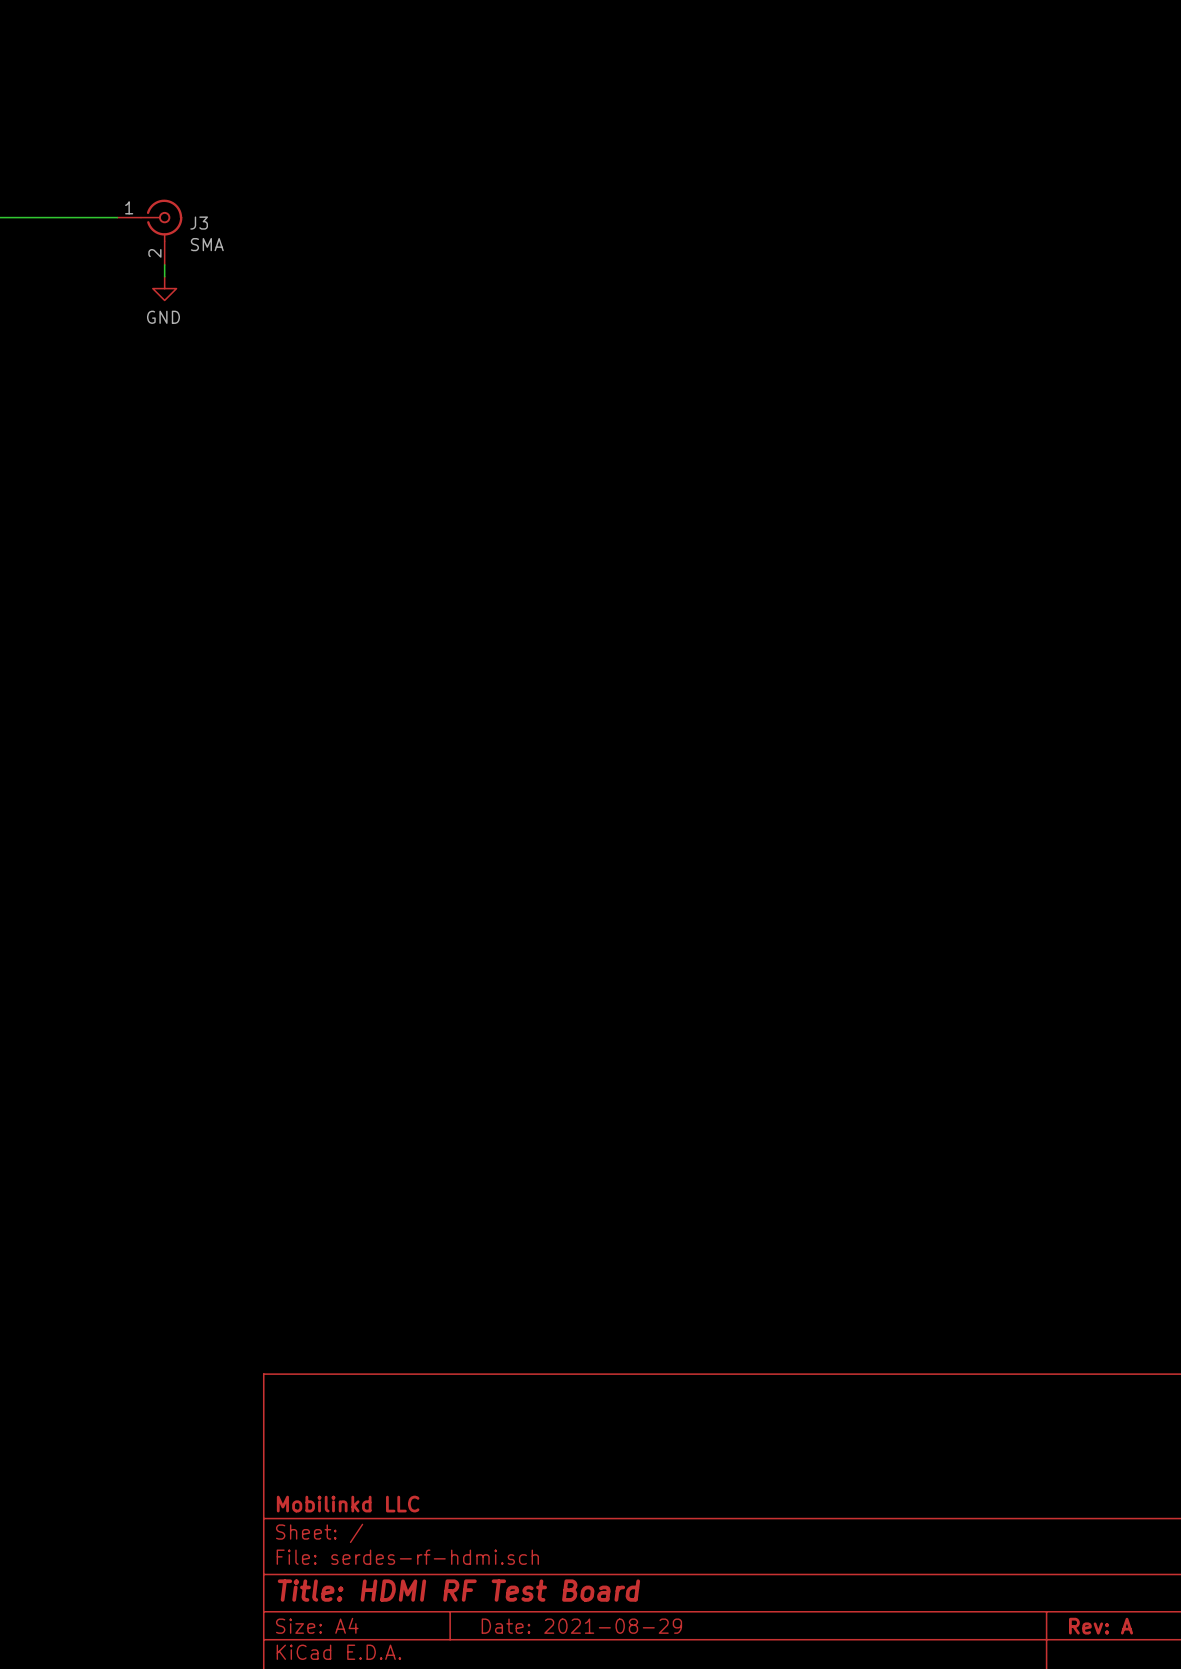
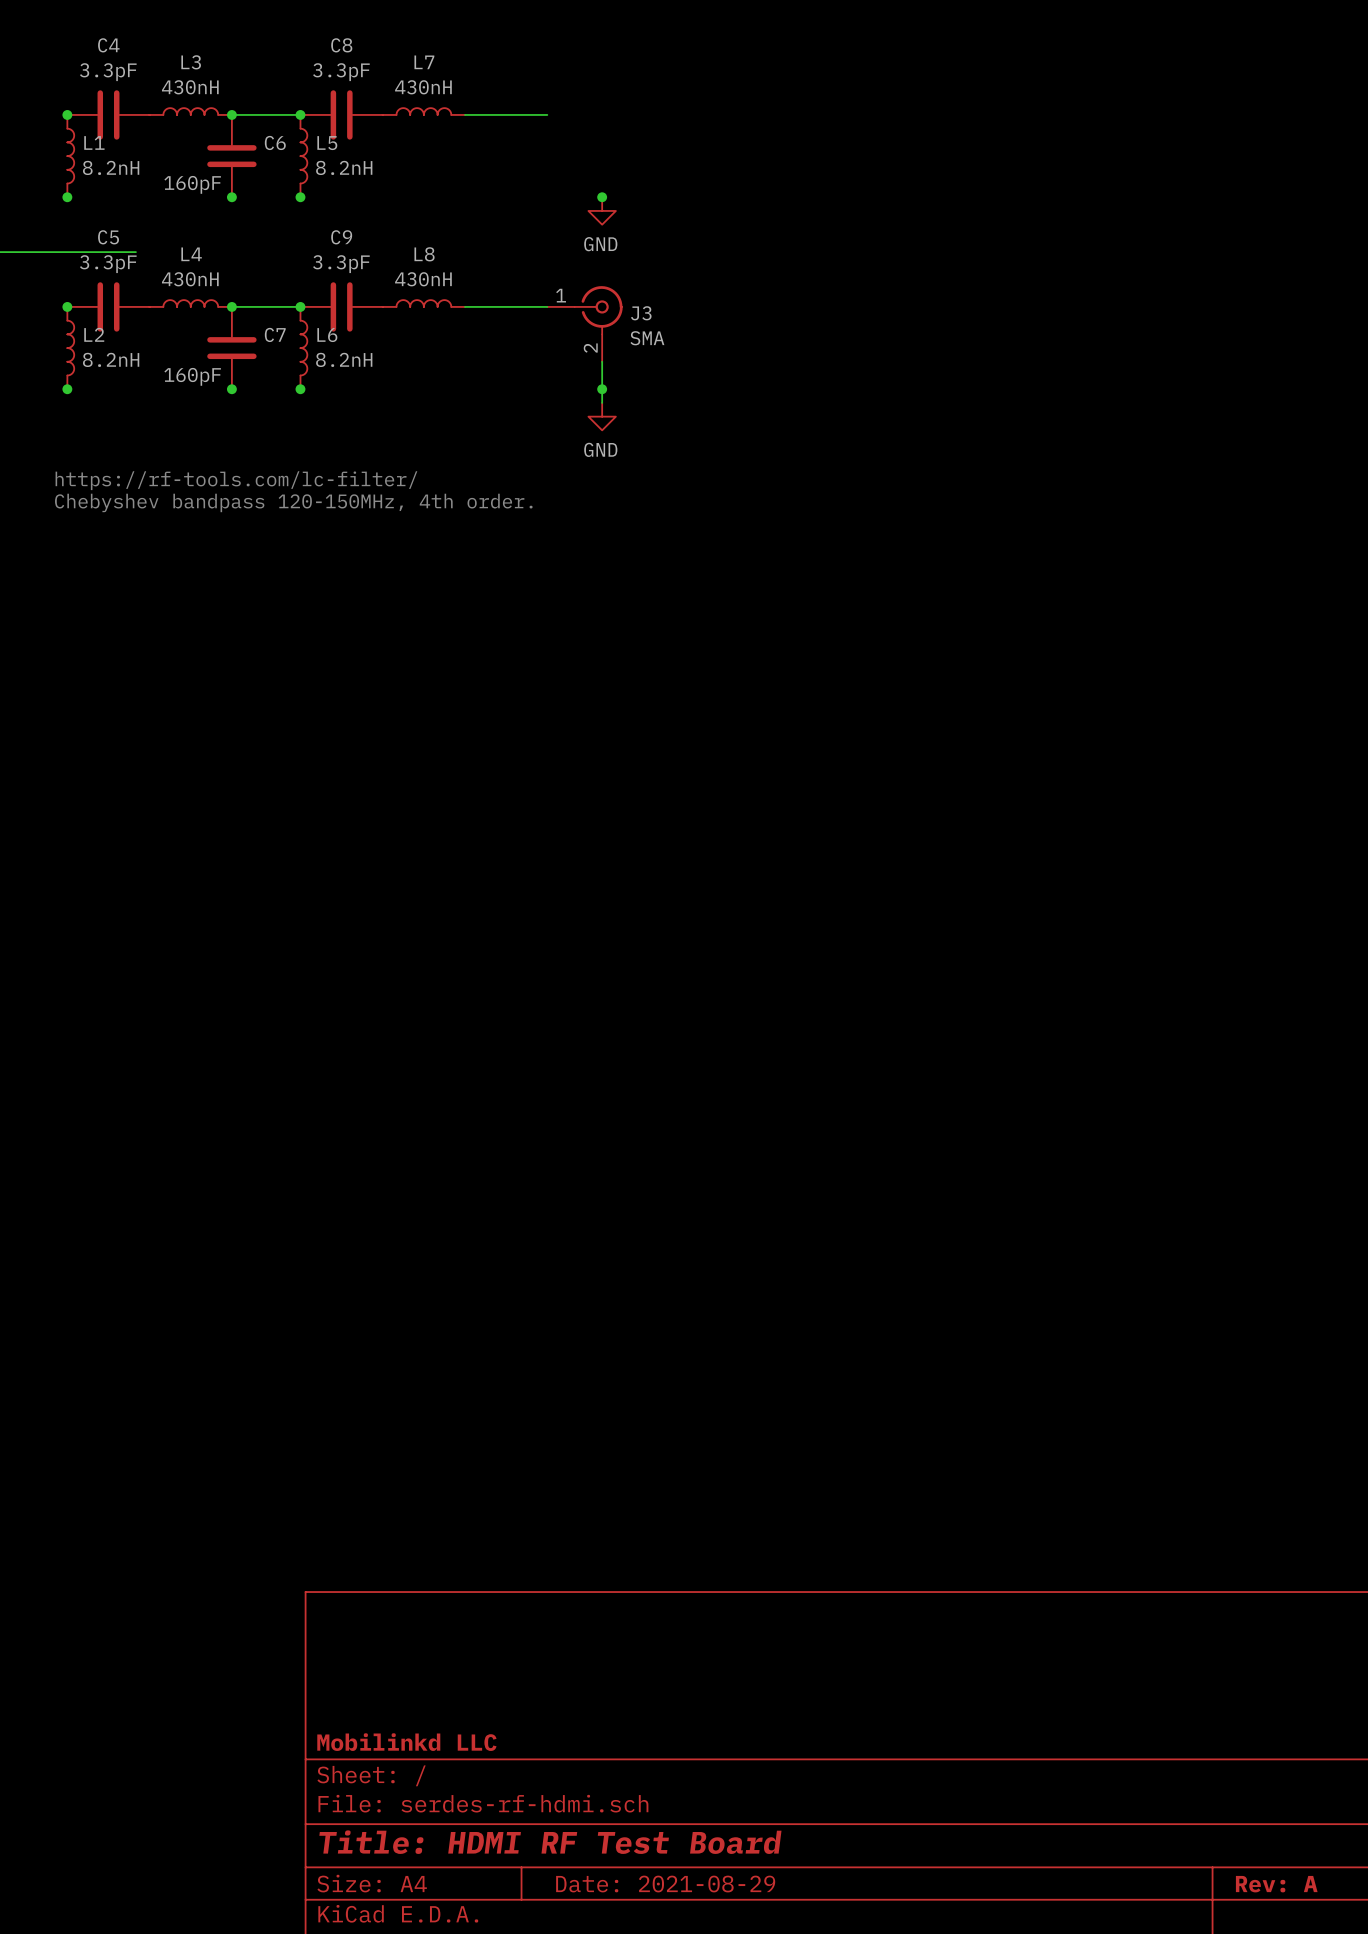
L3: none -> 430nH (190, 111)
L7: none -> 430nH (423, 111)
junction: none -> (67, 114)
C4: none -> 3.3pF (108, 114)
wire: none -> (231, 114) (300, 114)
junction: none -> (231, 114)
junction: none -> (300, 114)
C8: none -> 3.3pF (341, 114)
wire: none -> (465, 114) (547, 114)
L1: none -> 8.2nH (70, 156)
C6: none -> 160pF (231, 156)
L5: none -> 8.2nH (303, 156)
junction: none -> (67, 197)
junction: none -> (231, 197)
junction: none -> (300, 197)
junction: none -> (602, 197)
power symbol: none -> GND (602, 210)
J3 position: (149, 232) -> (585, 323)
L4: none -> 430nH (190, 303)
L8: none -> 430nH (423, 303)
junction: none -> (67, 306)
C5: none -> 3.3pF (108, 306)
wire: (164, 264) (164, 276) -> none
wire: none -> (231, 306) (300, 306)
junction: none -> (231, 306)
junction: none -> (300, 306)
C9: none -> 3.3pF (341, 306)
wire: none -> (465, 306) (547, 306)
power symbol: GND (164, 288) -> none
L2: none -> 8.2nH (70, 348)
C7: none -> 160pF (231, 348)
L6: none -> 8.2nH (303, 348)
wire: none -> (602, 361) (602, 402)
junction: none -> (67, 389)
junction: none -> (231, 389)
junction: none -> (300, 389)
junction: none -> (602, 389)
power symbol: none -> GND (602, 416)
text: none -> https://rf-tools.com/lc-filter/ (236, 480)
text: none -> Chebyshev bandpass 120-150MHz, 4th order. (293, 502)

